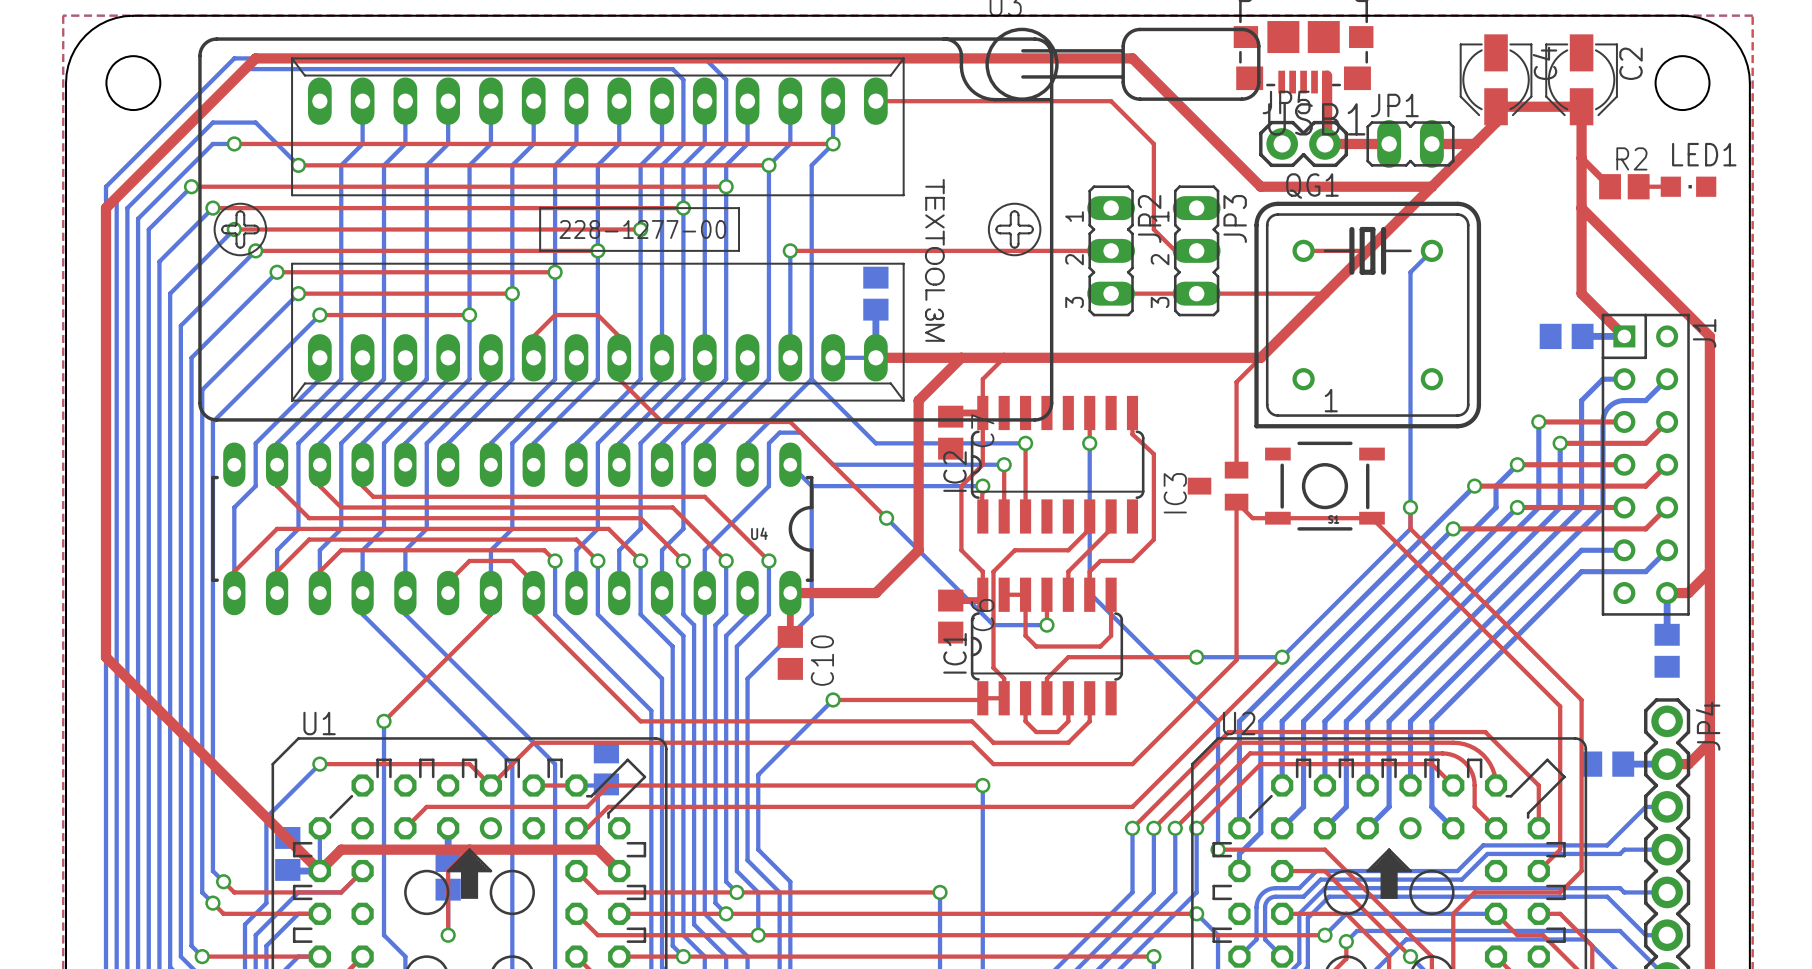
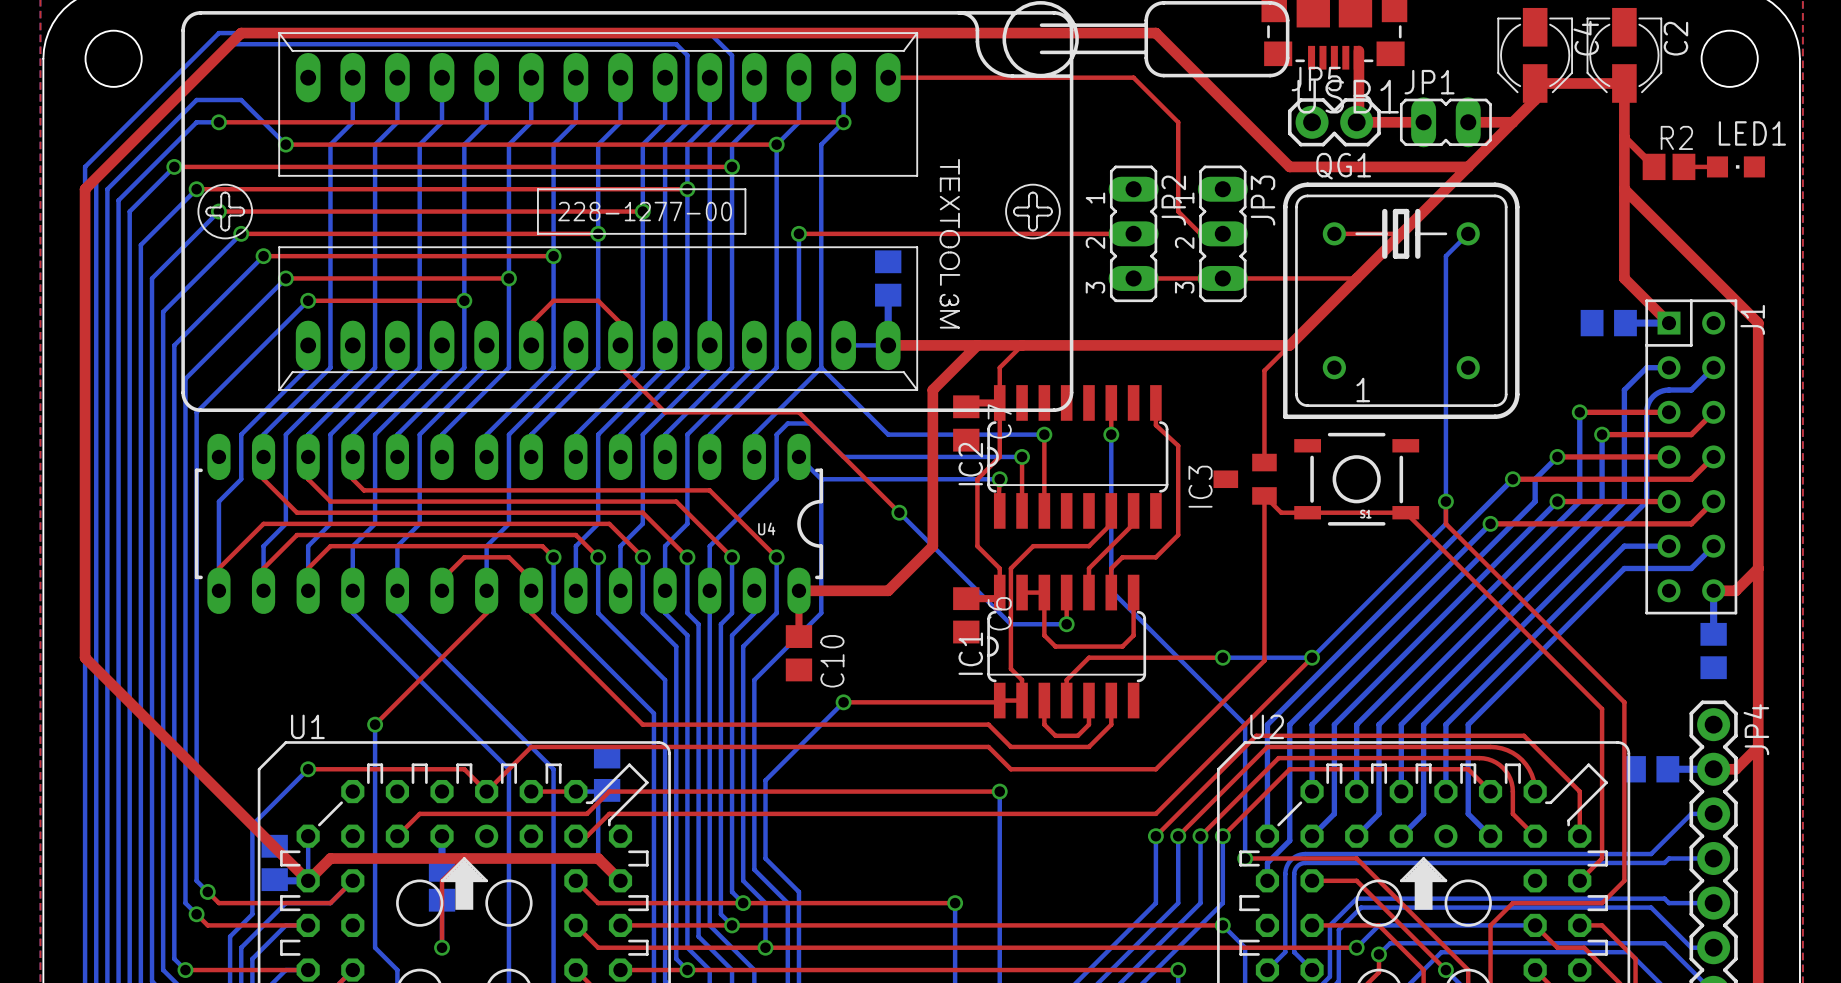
bottom track: (1483, 845) (1457, 871) (1316, 871) (1299, 888) (1273, 888) (1266, 890) (1259, 897) (1256, 907) -> (1521, 854) (1300, 854) (1291, 859) (1285, 868) (1285, 918)
bottom track: (1487, 853) (1461, 879) (1320, 879) (1303, 896) (1273, 897) (1267, 900) (1265, 907) -> (1526, 862) (1302, 863) (1296, 867) (1294, 872) (1294, 918)

